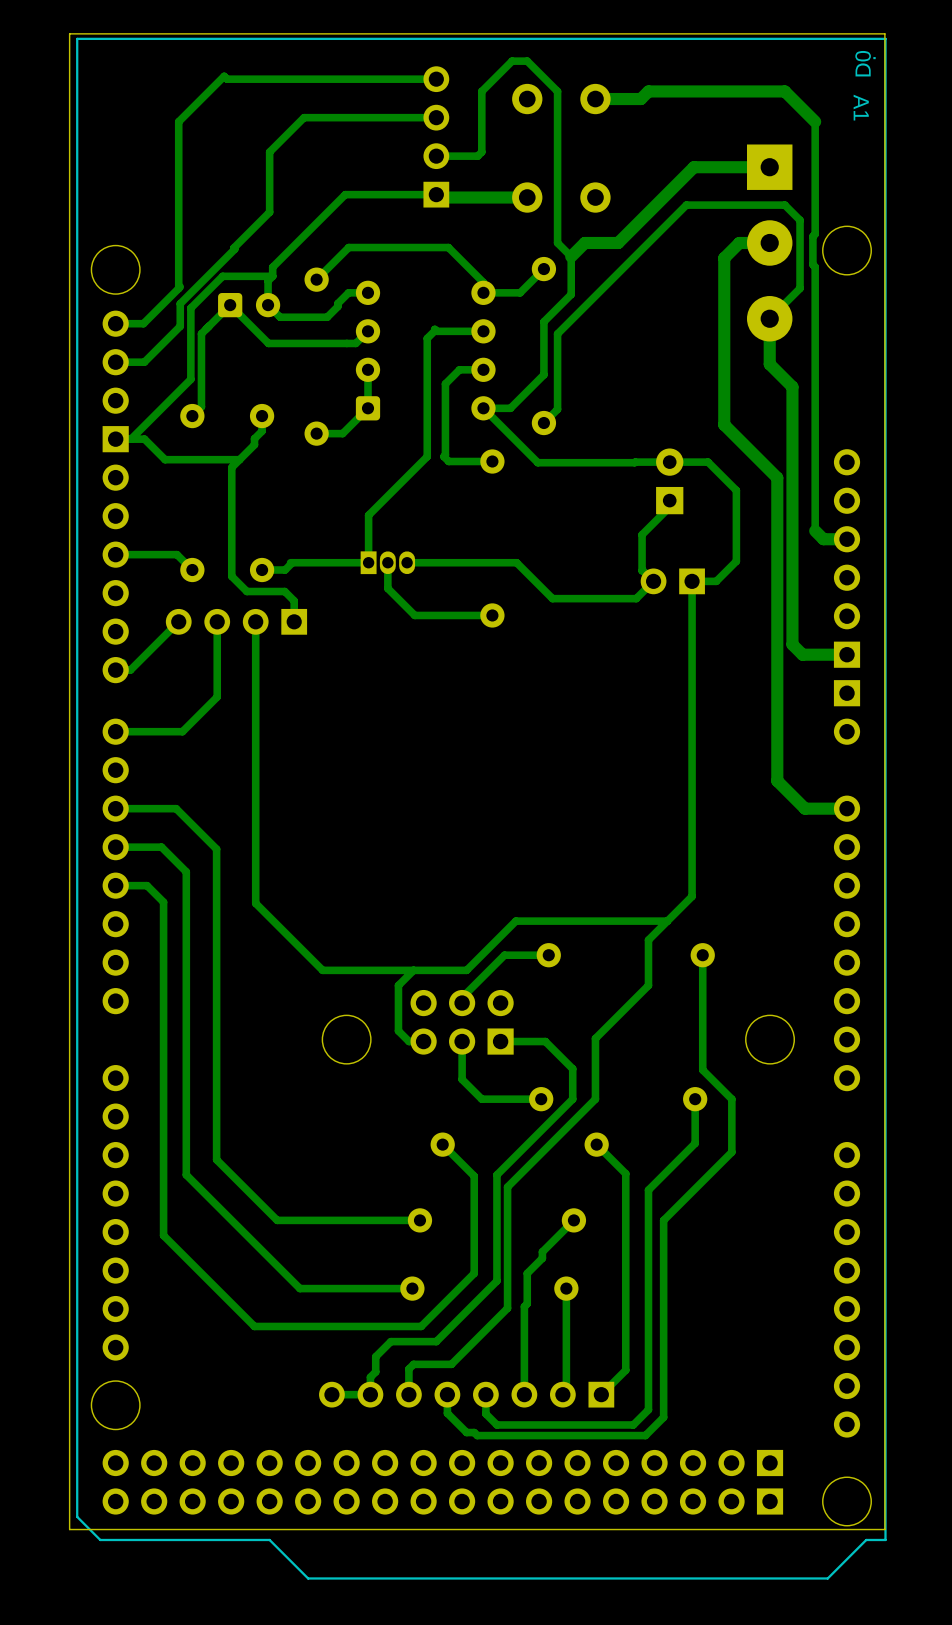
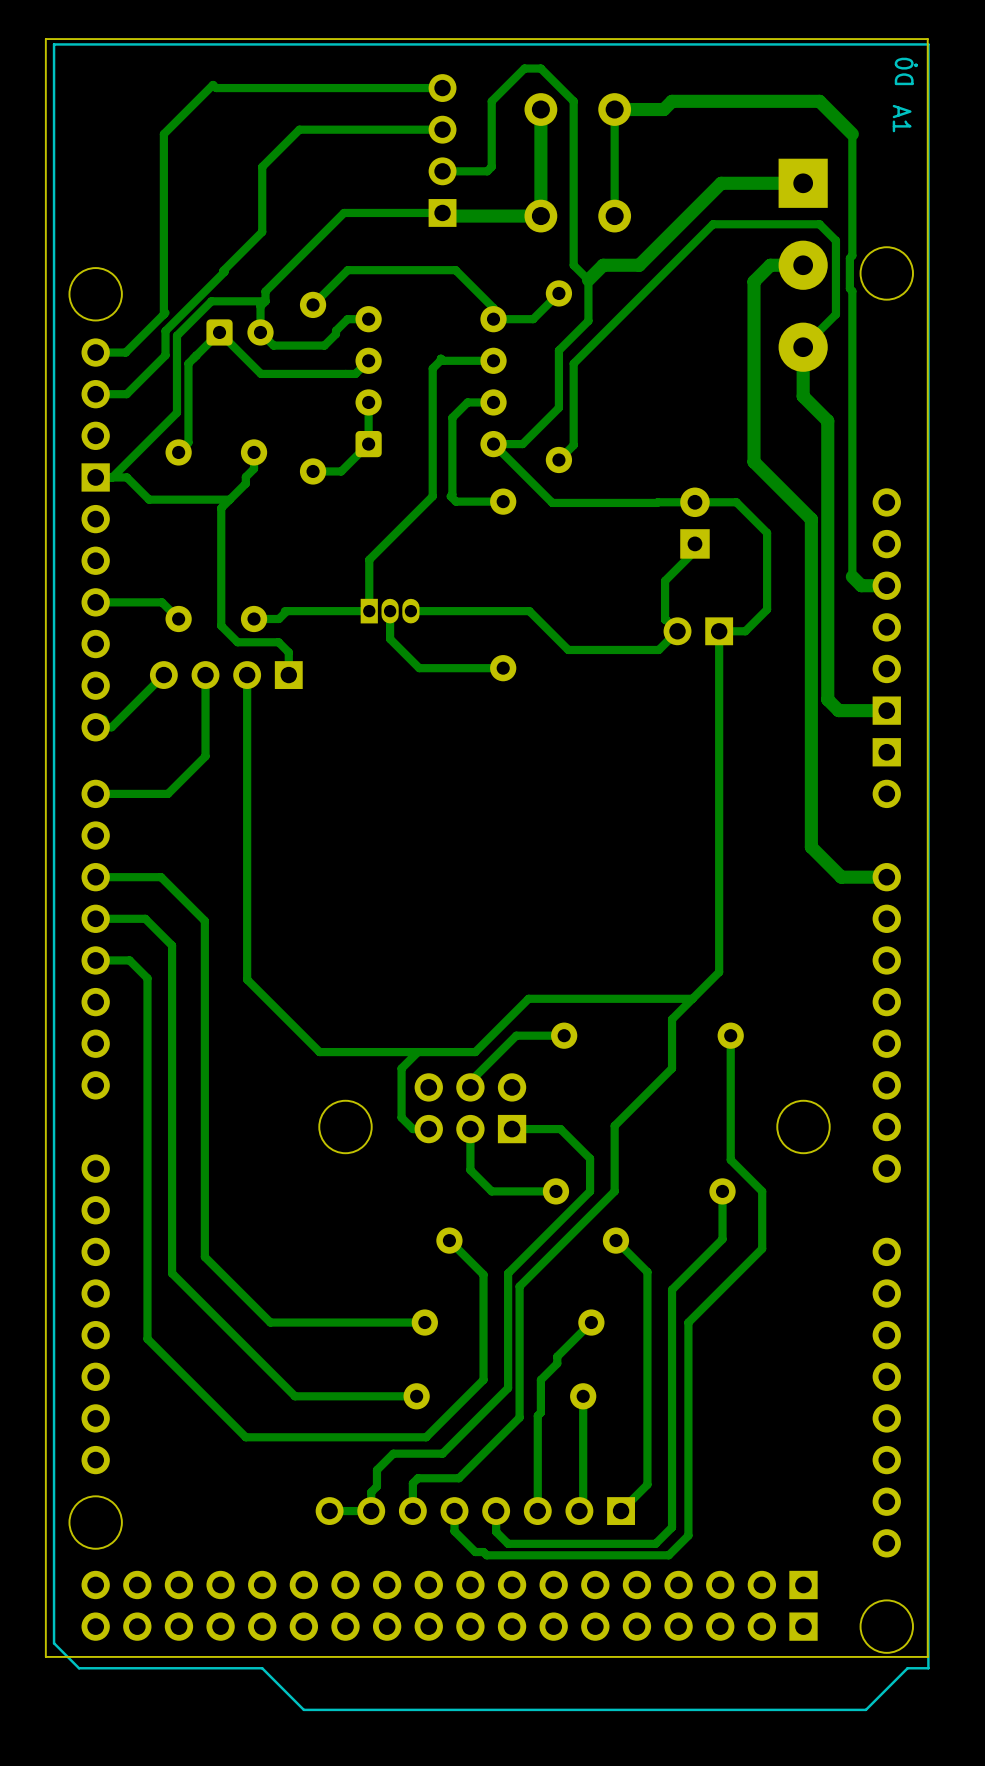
bottom track: none -> (540, 109) (540, 216)
bottom track: none -> (614, 109) (614, 216)

